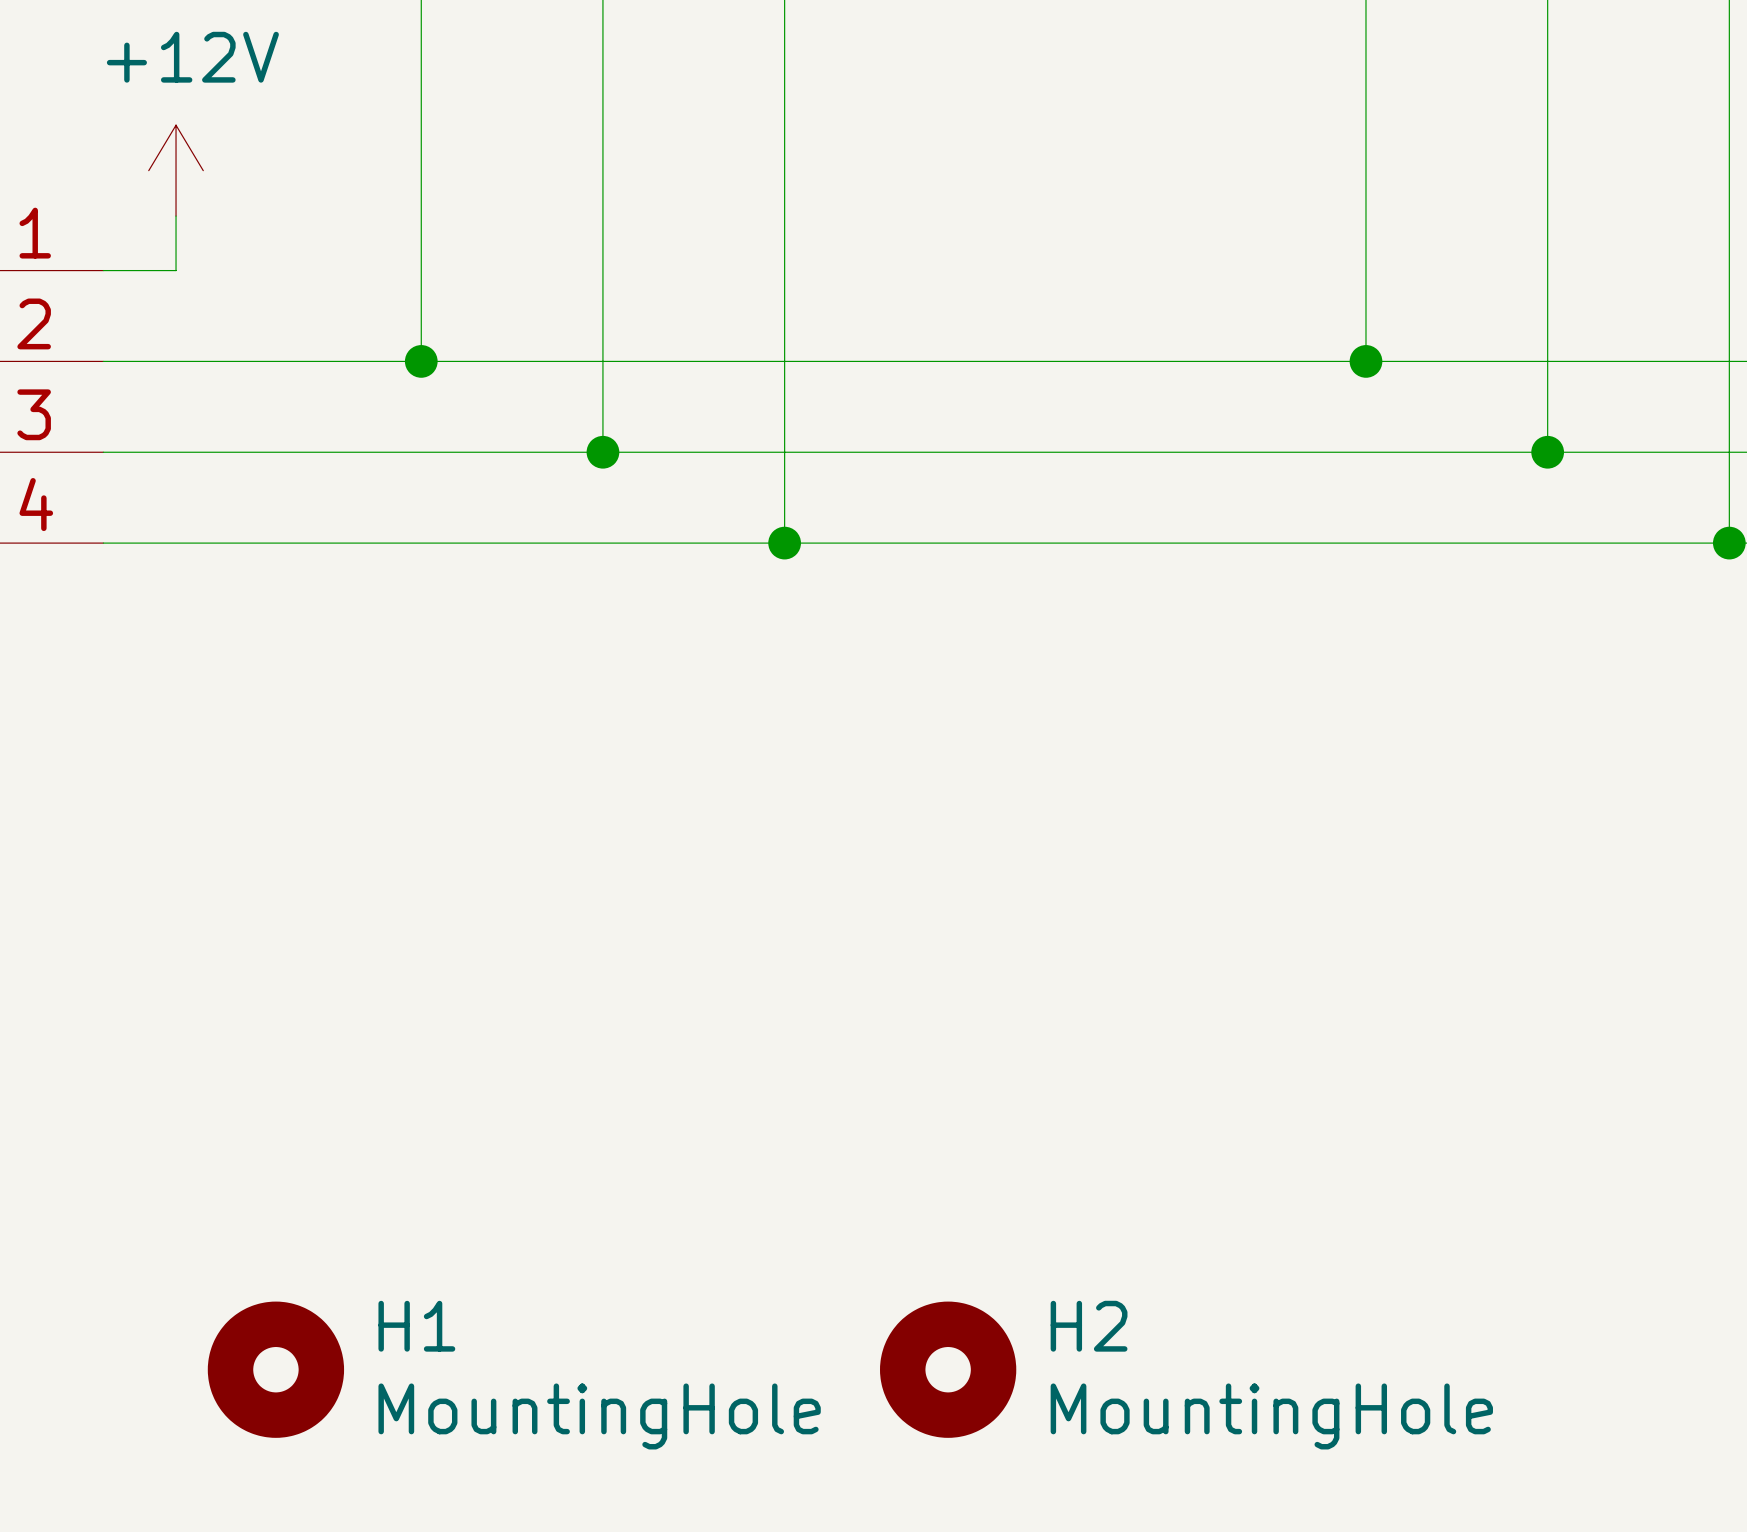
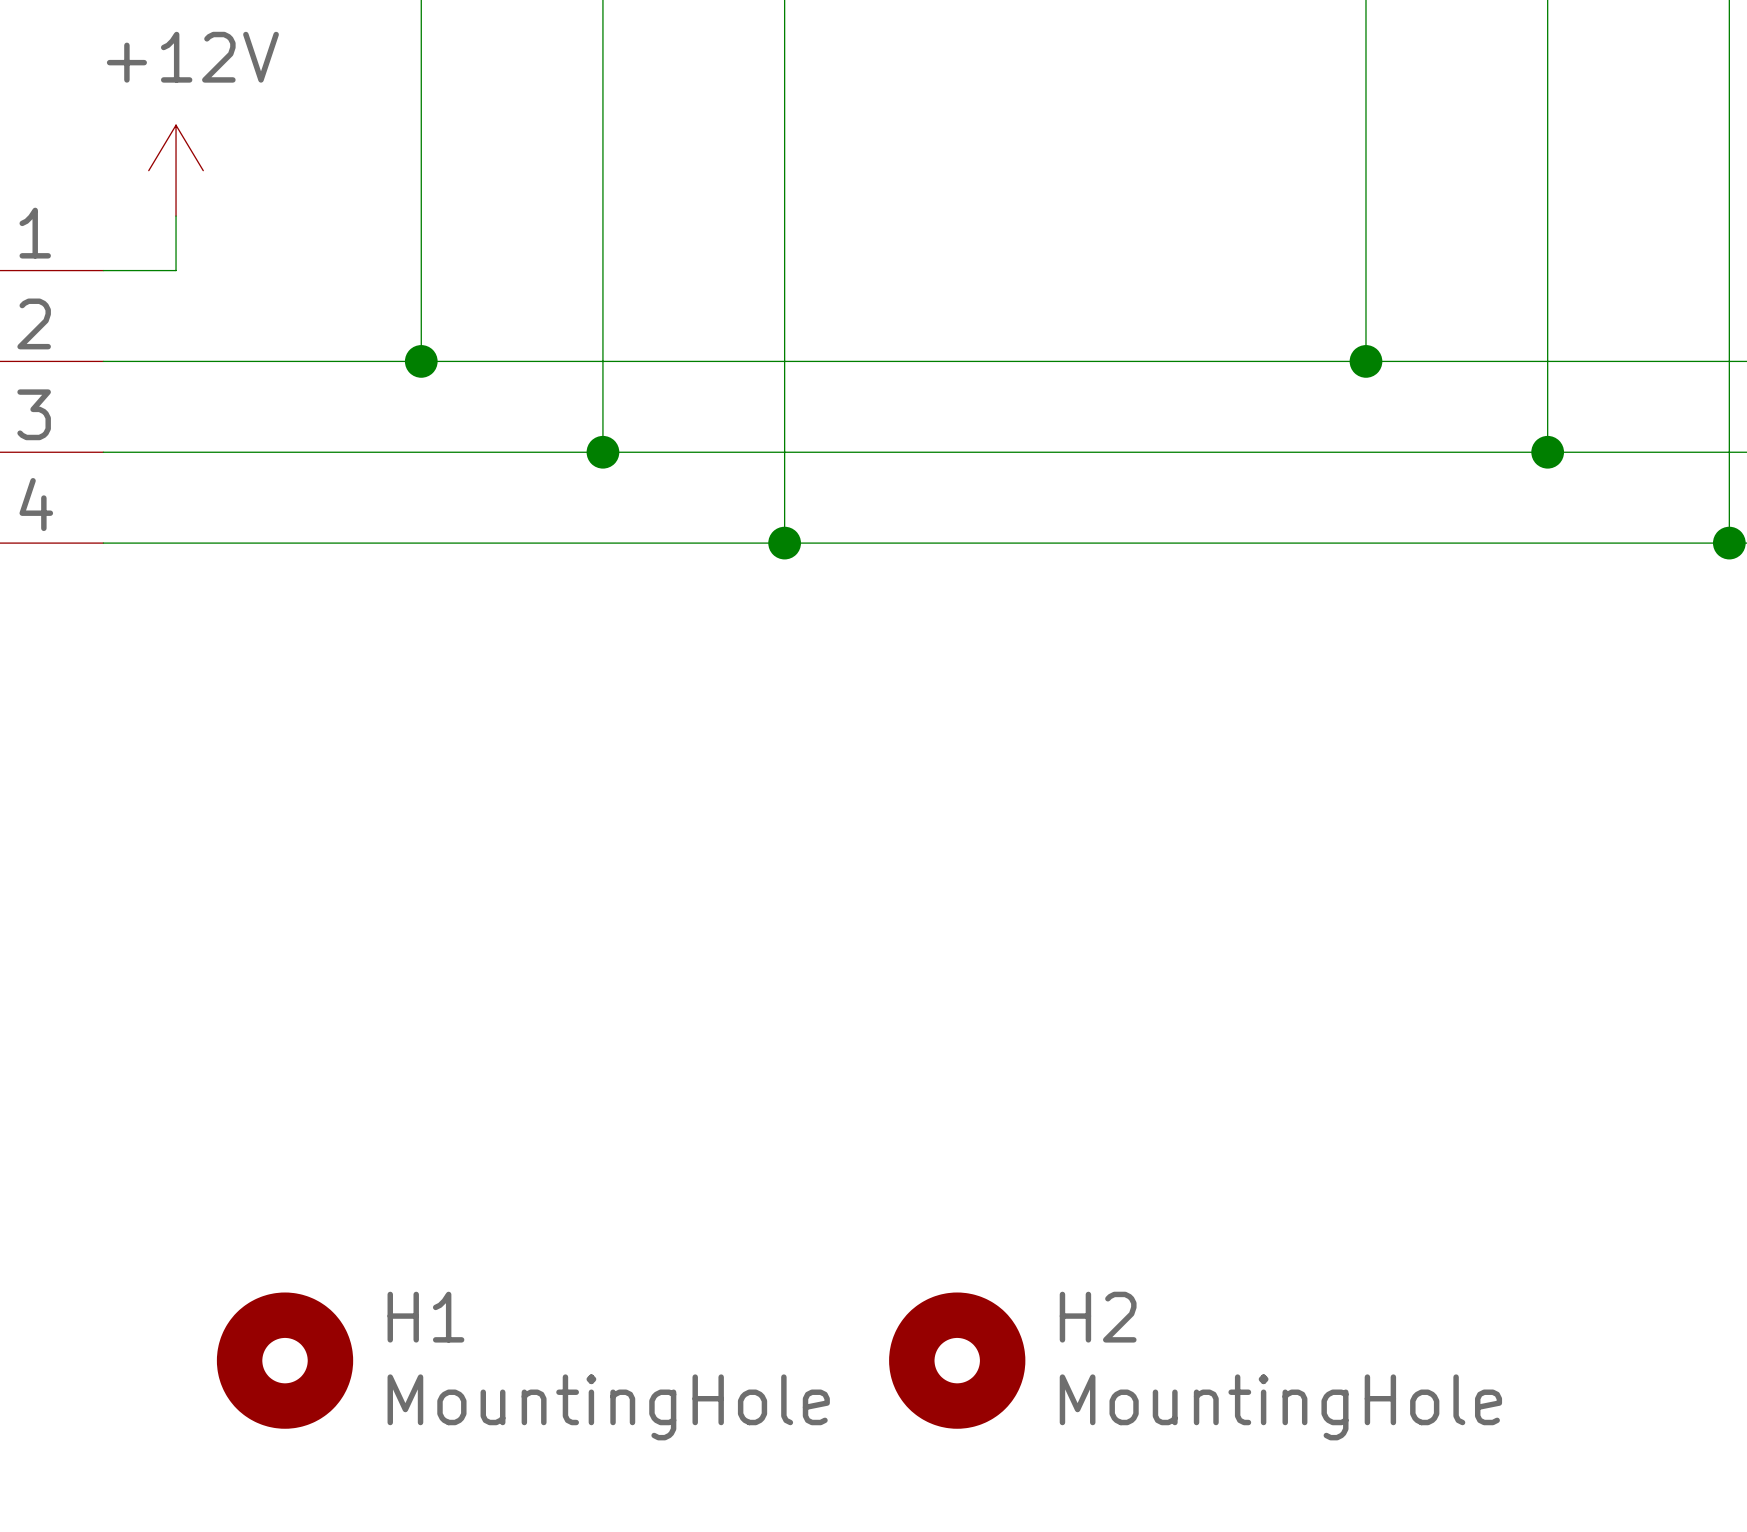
H1 position: (275, 1369) -> (285, 1360)
H2 position: (948, 1369) -> (957, 1360)

